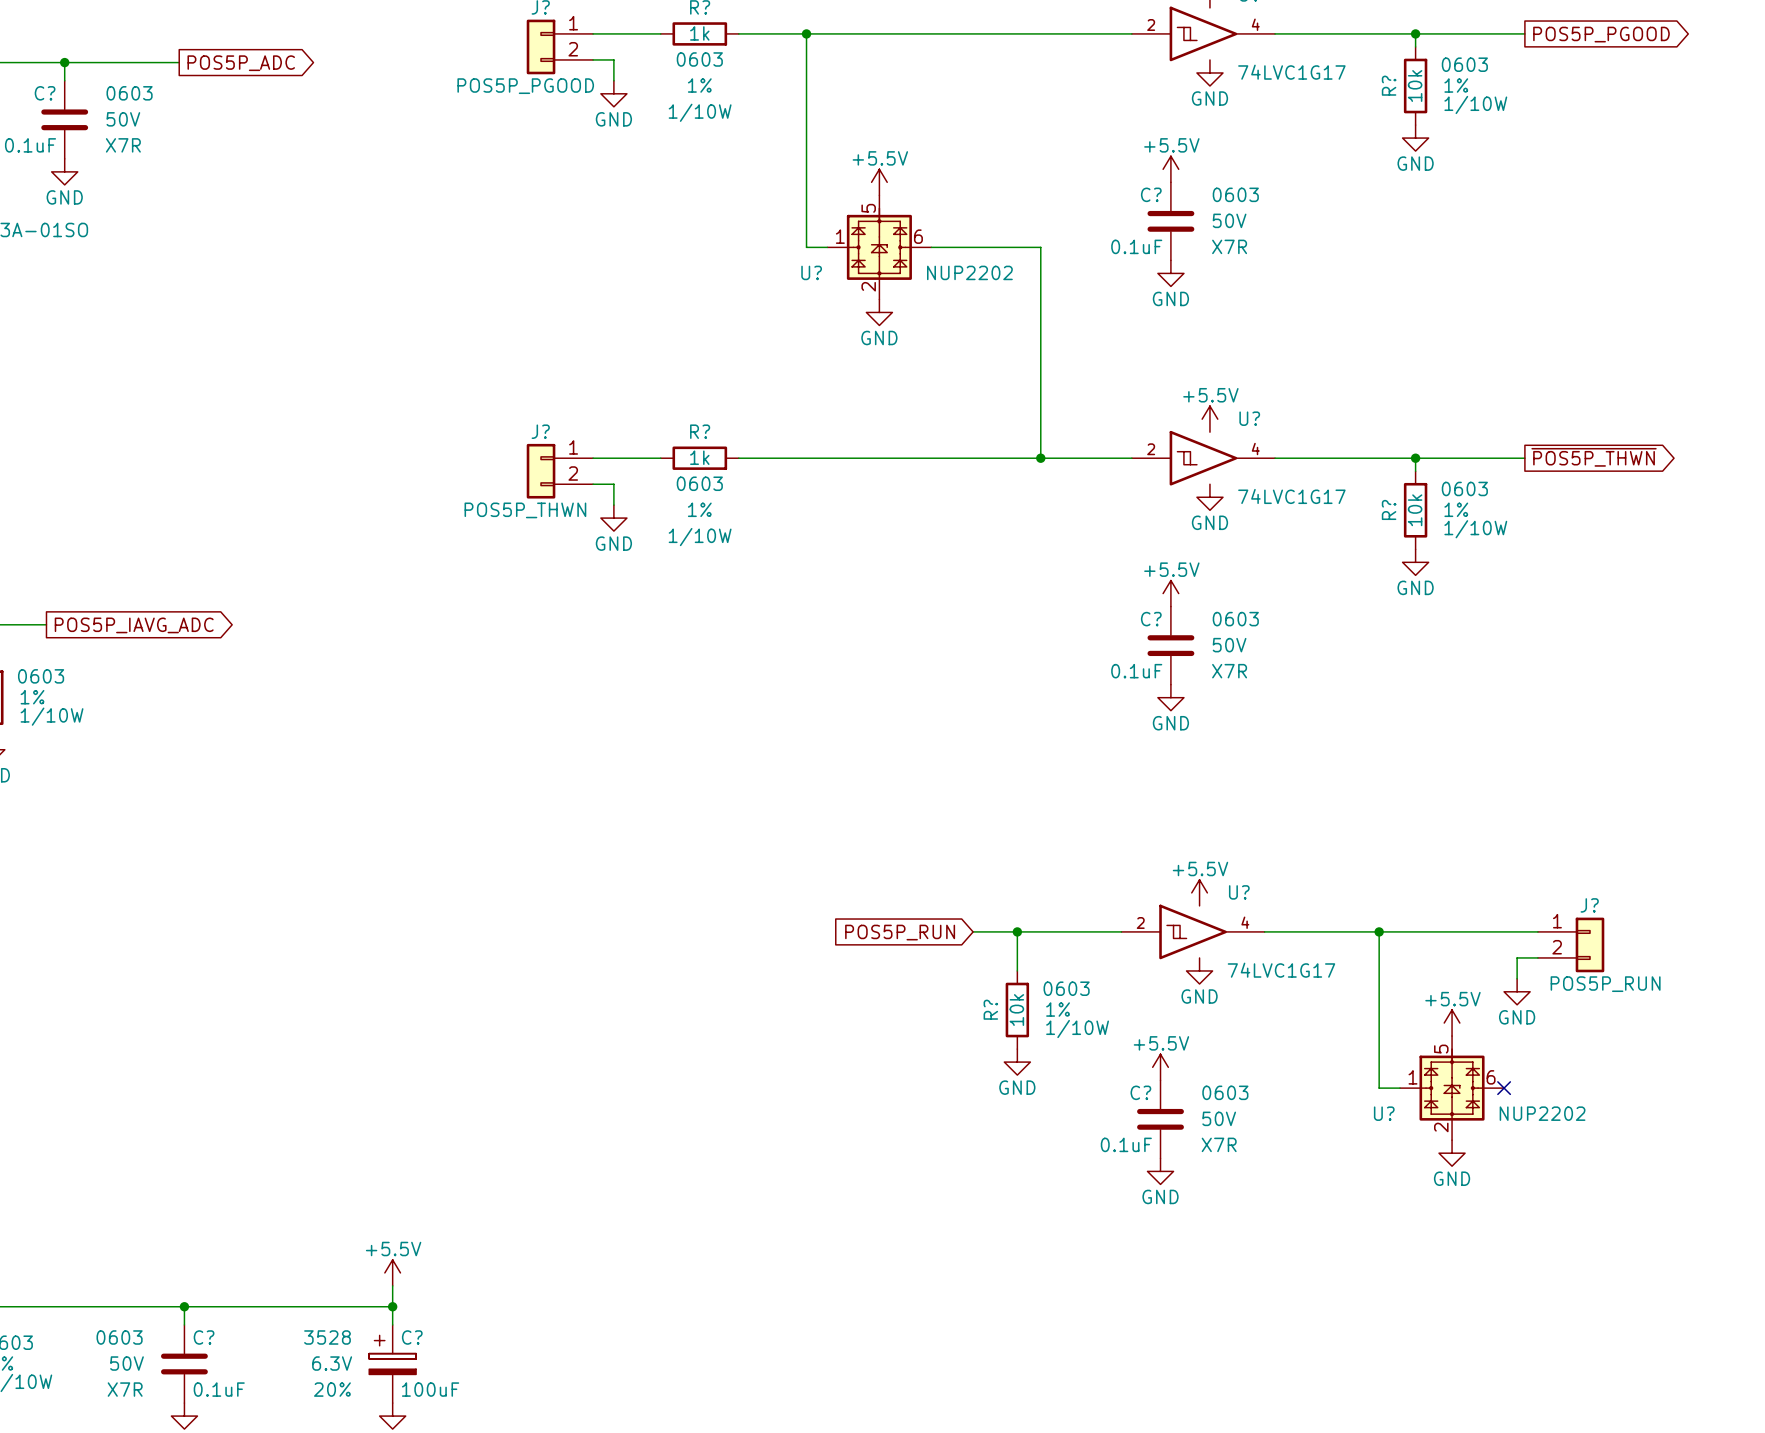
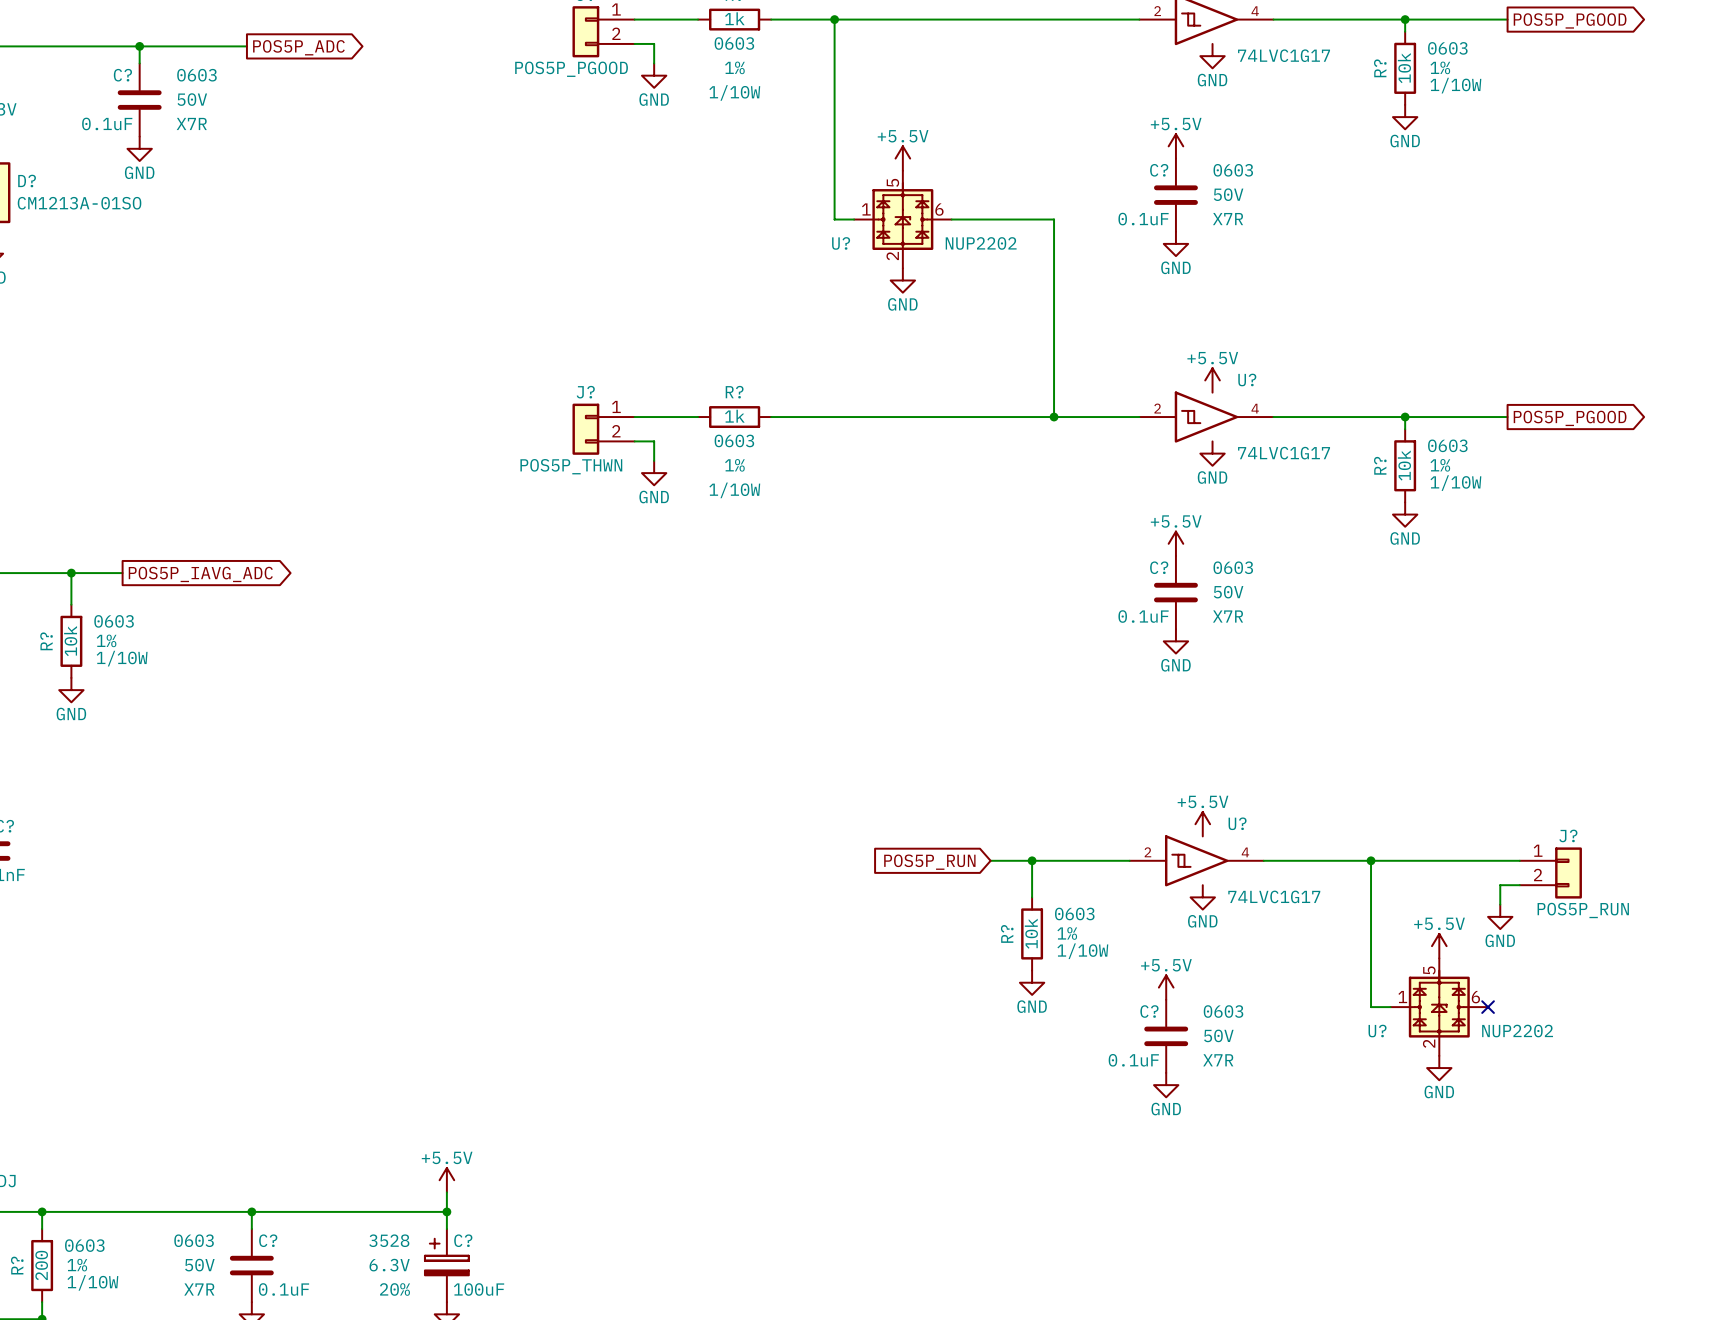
global label: ~{POS5P_THWN} (1594, 457) -> POS5P_PGOOD (1570, 418)

